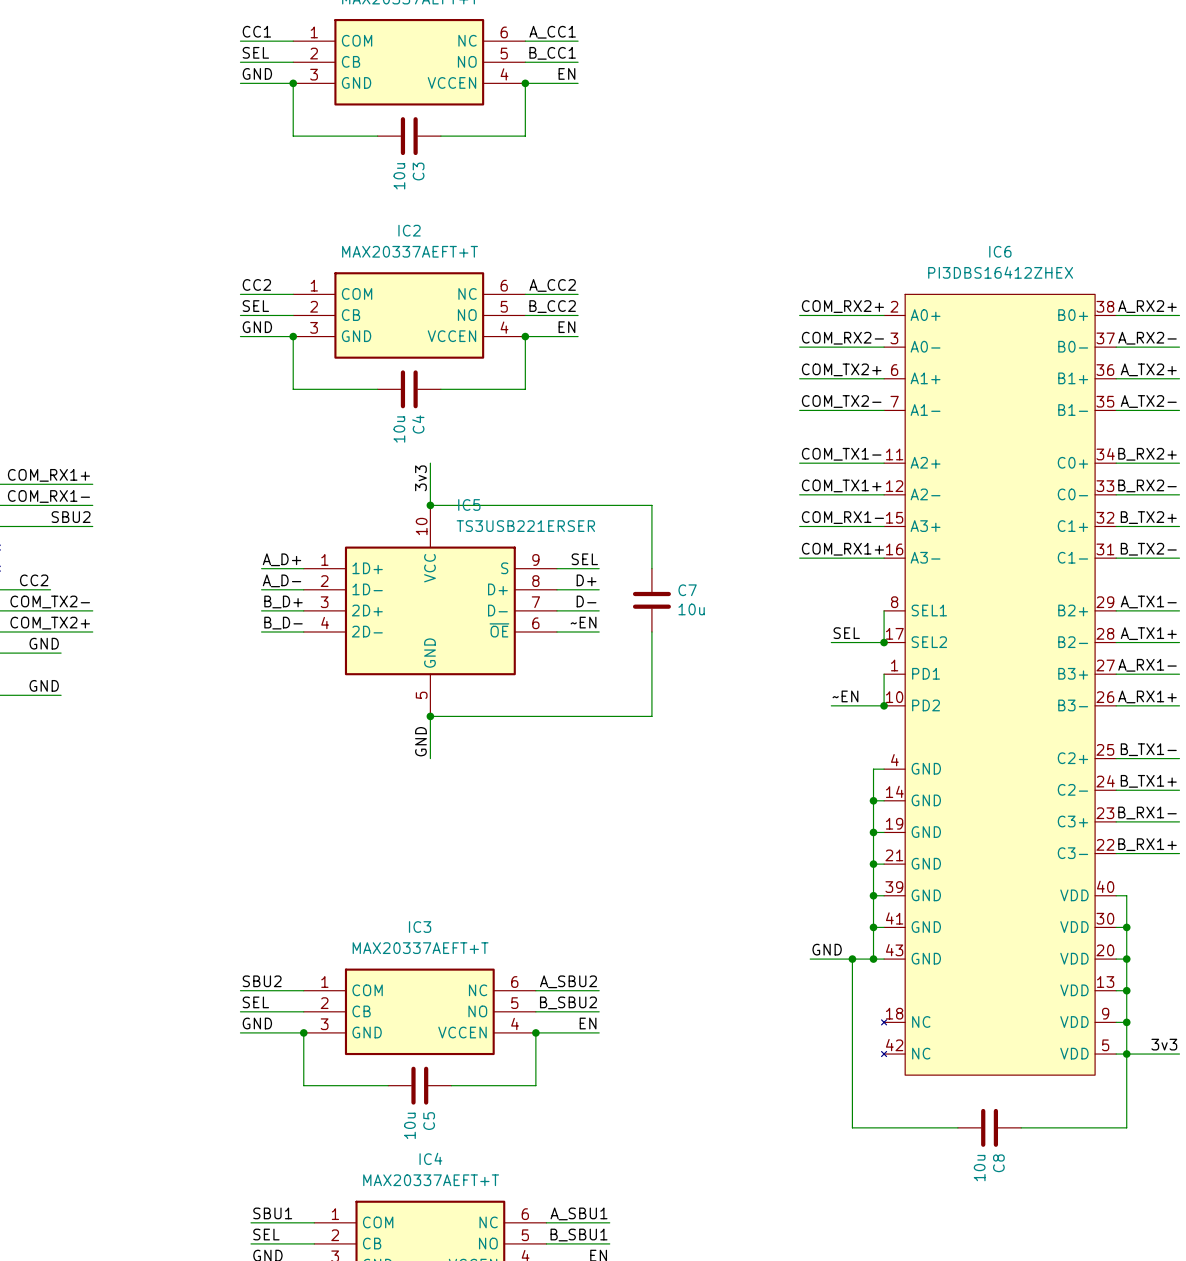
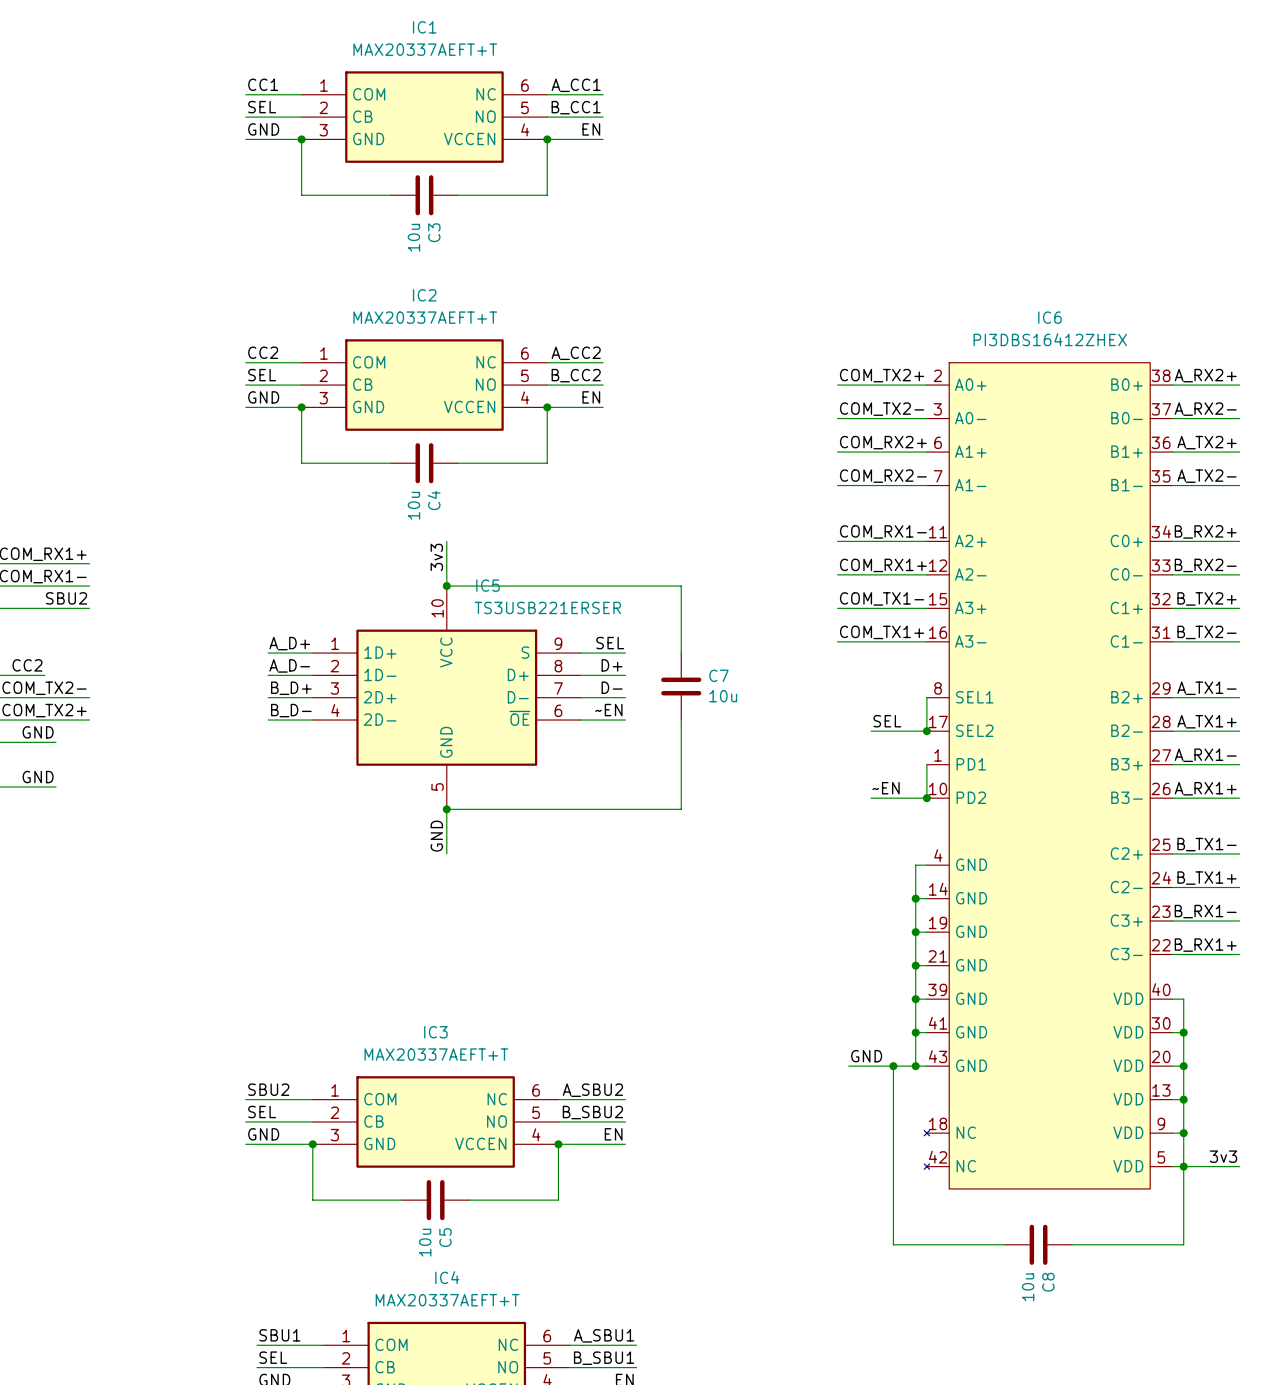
label: COM_RX2+ (842, 306) -> COM_TX2+ (882, 375)
label: COM_RX2- (842, 338) -> COM_TX2- (882, 409)
label: COM_TX2+ (841, 369) -> COM_RX2+ (883, 442)
label: COM_TX2- (841, 401) -> COM_RX2- (883, 476)
label: COM_TX1- (841, 454) -> COM_RX1- (883, 531)
label: COM_TX1+ (841, 485) -> COM_RX1+ (883, 565)
label: COM_RX1- (842, 517) -> COM_TX1- (882, 598)
label: COM_RX1+ (842, 549) -> COM_TX1+ (882, 632)

